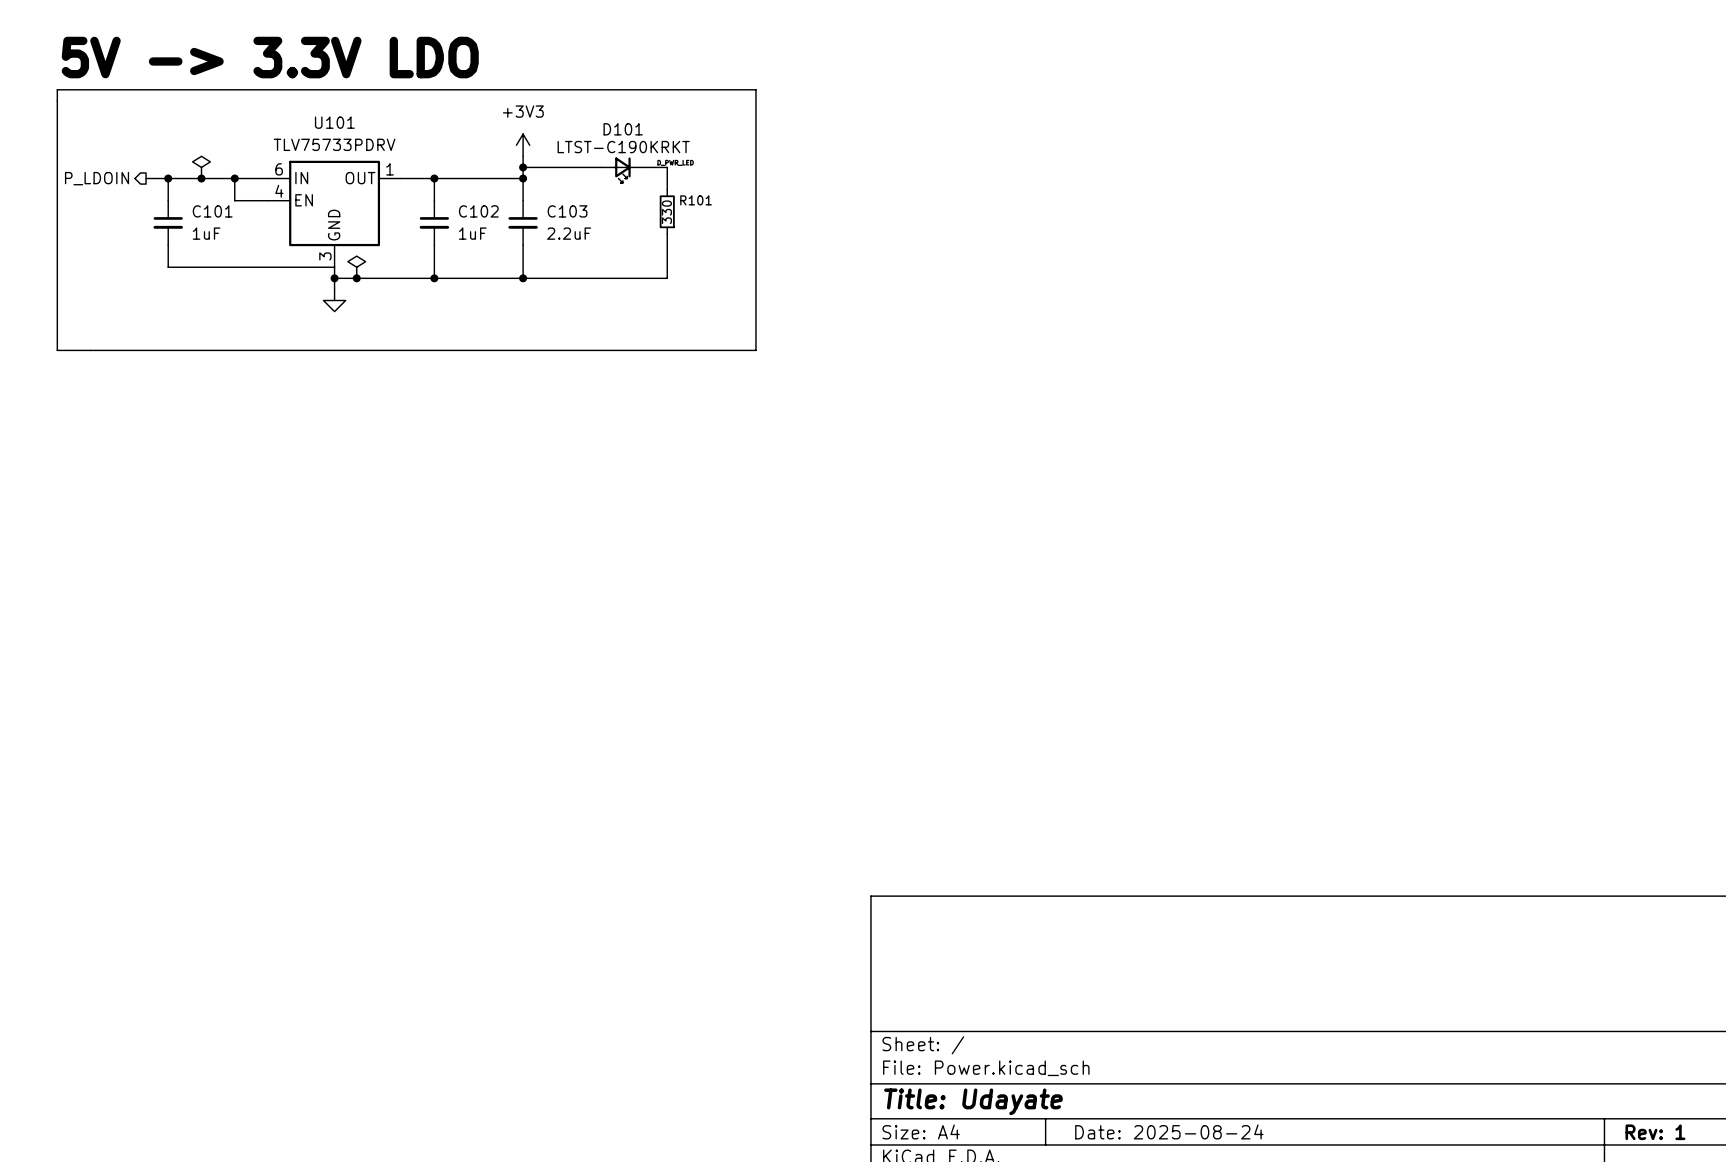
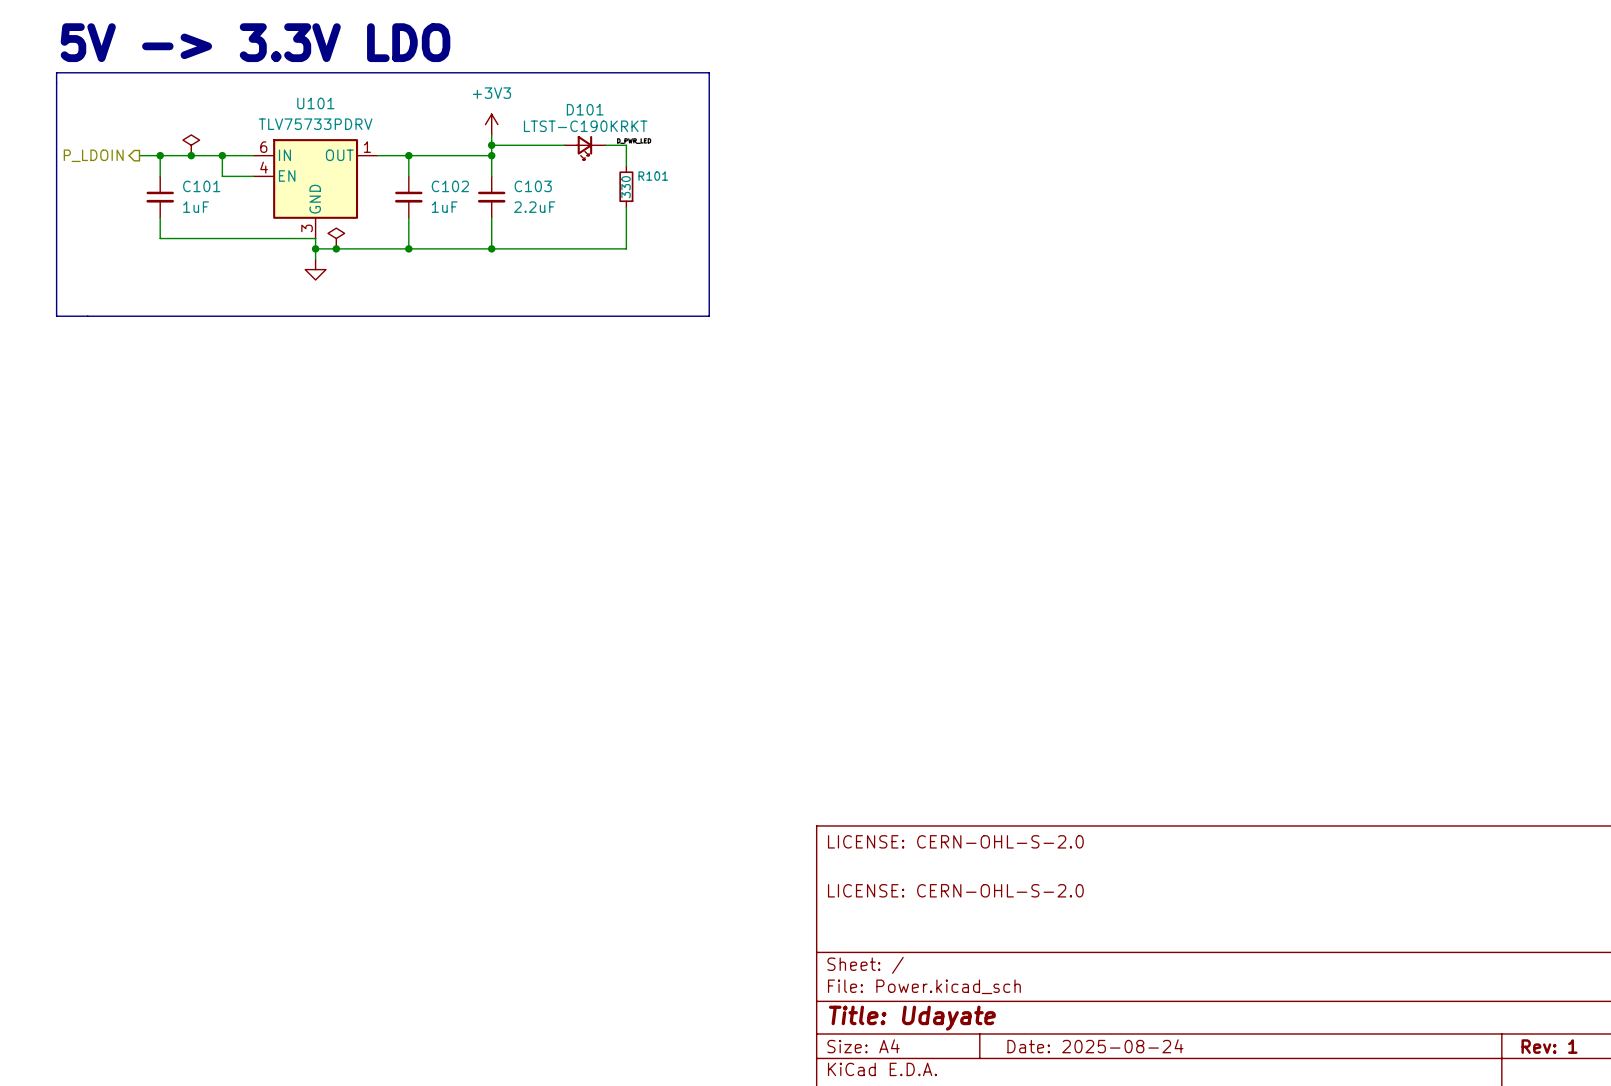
title block: none -> LICENSE: CERN-OHL-S-2.0 (955, 841)
title block: none -> LICENSE: CERN-OHL-S-2.0 (955, 890)

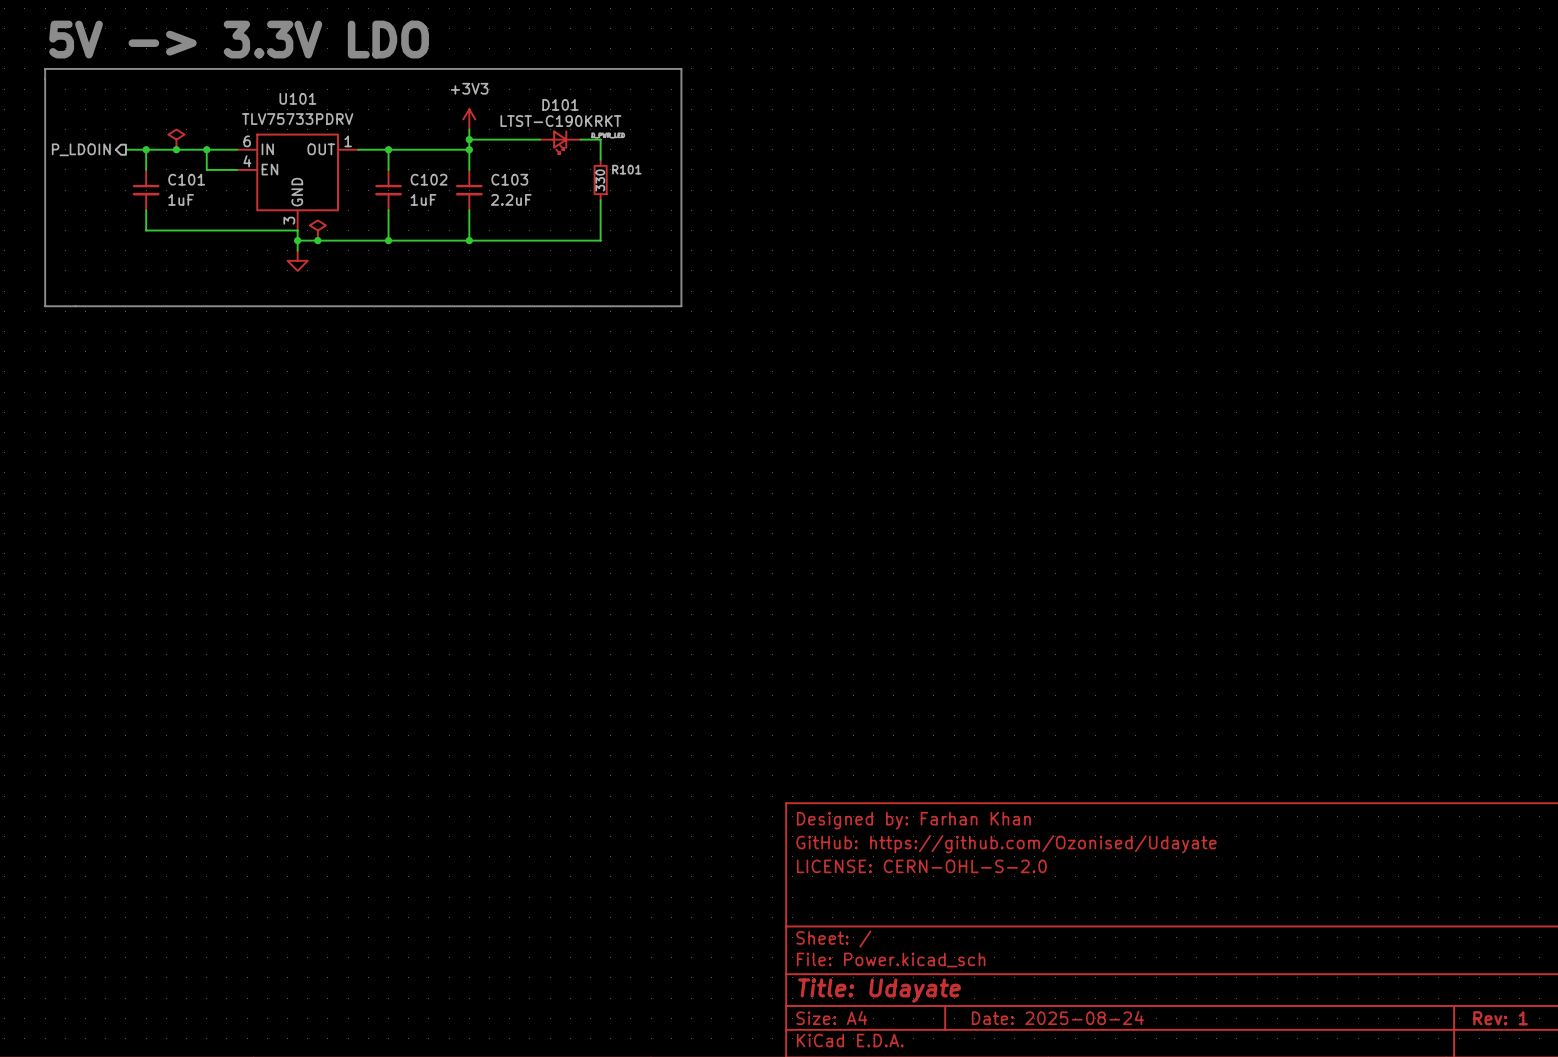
title block: LICENSE: CERN-OHL-S-2.0 (955, 841) -> Designed by: Farhan Khan (913, 820)
title block: none -> GitHub: https://github.com/Ozonised/Udayate (1006, 844)

